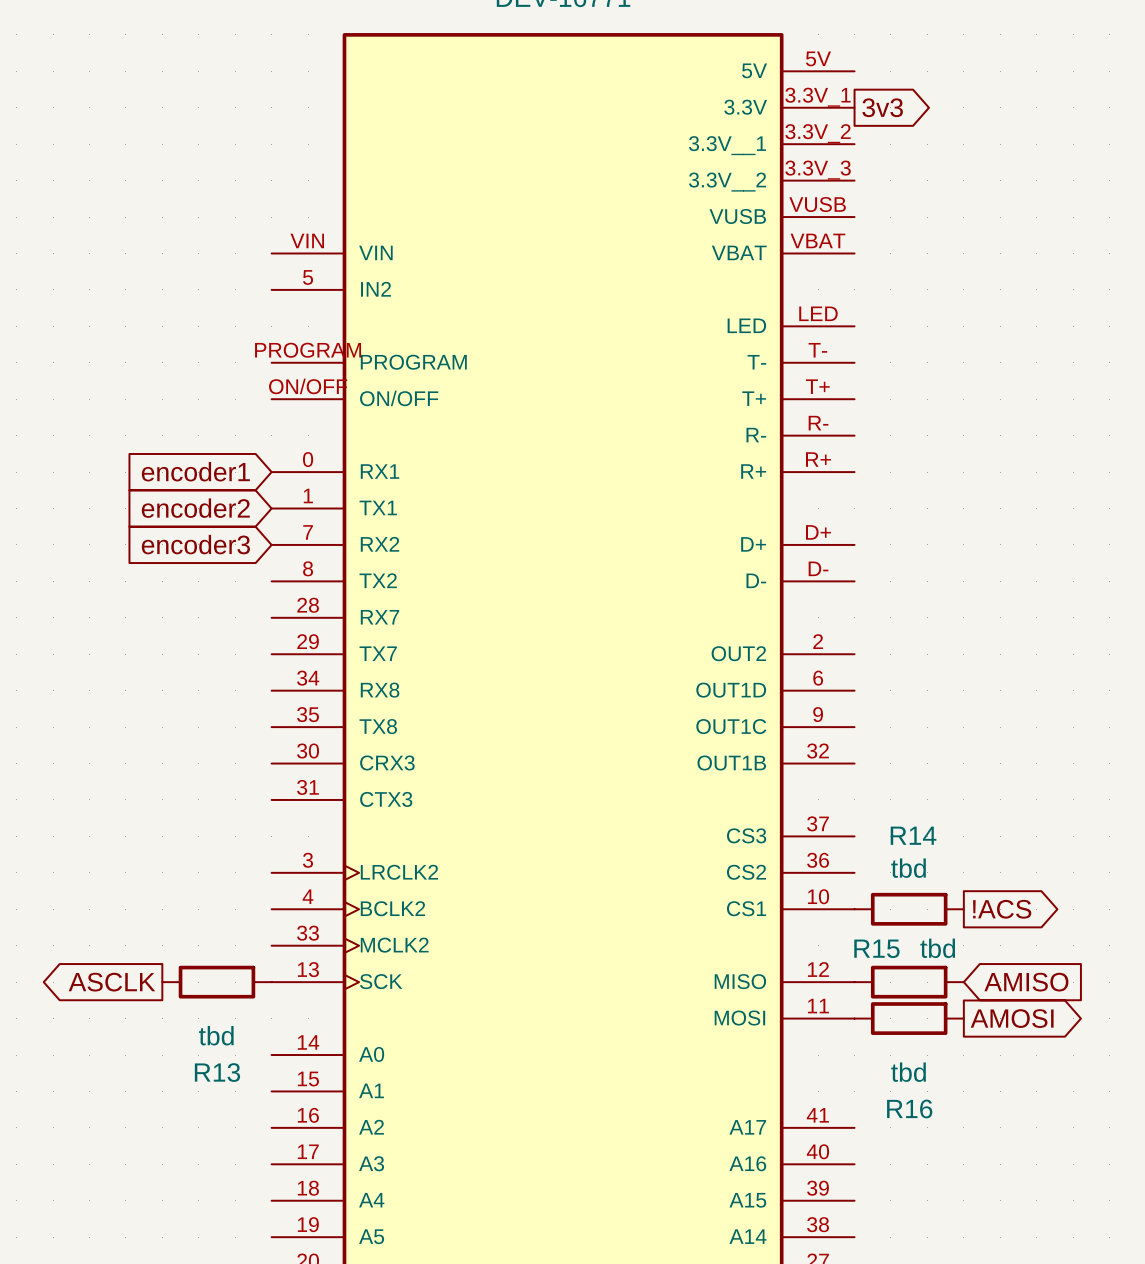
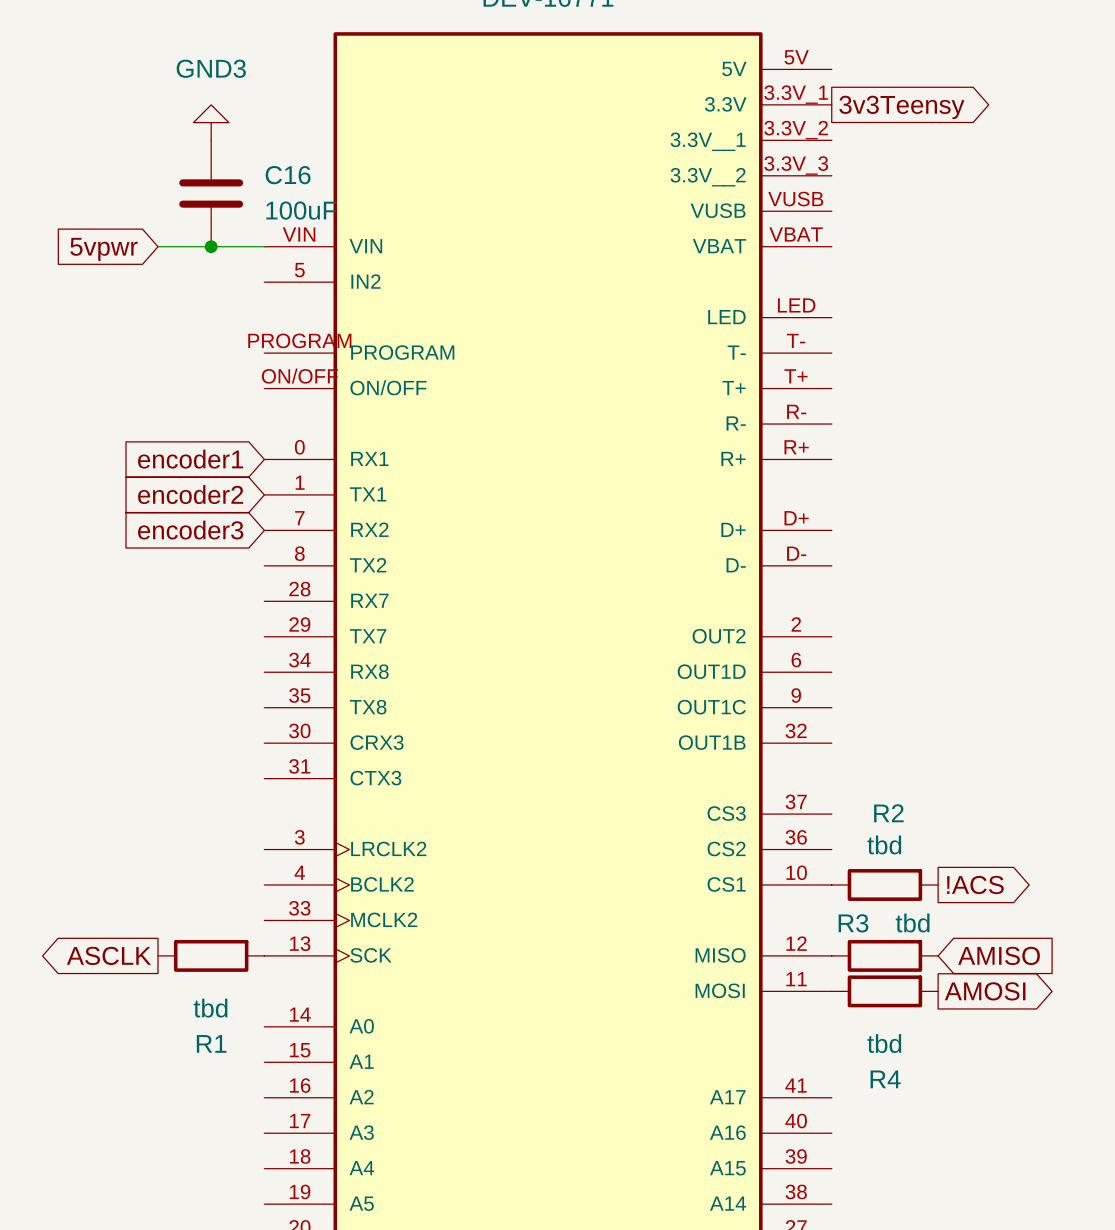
global label: 3v3 (882, 107) -> 3v3Teensy (901, 107)
power symbol: none -> GND3 (211, 122)
C16: none -> 100uF (211, 193)
wire: none -> (157, 246) (264, 246)
junction: none -> (211, 246)
global label: none -> 5vpwr (103, 249)
R14 name: R14 (913, 835) -> R2 (888, 813)
R15 name: R15 (876, 948) -> R3 (853, 923)
R13 name: R13 (217, 1072) -> R1 (211, 1043)
R16 name: R16 (909, 1108) -> R4 (885, 1079)

